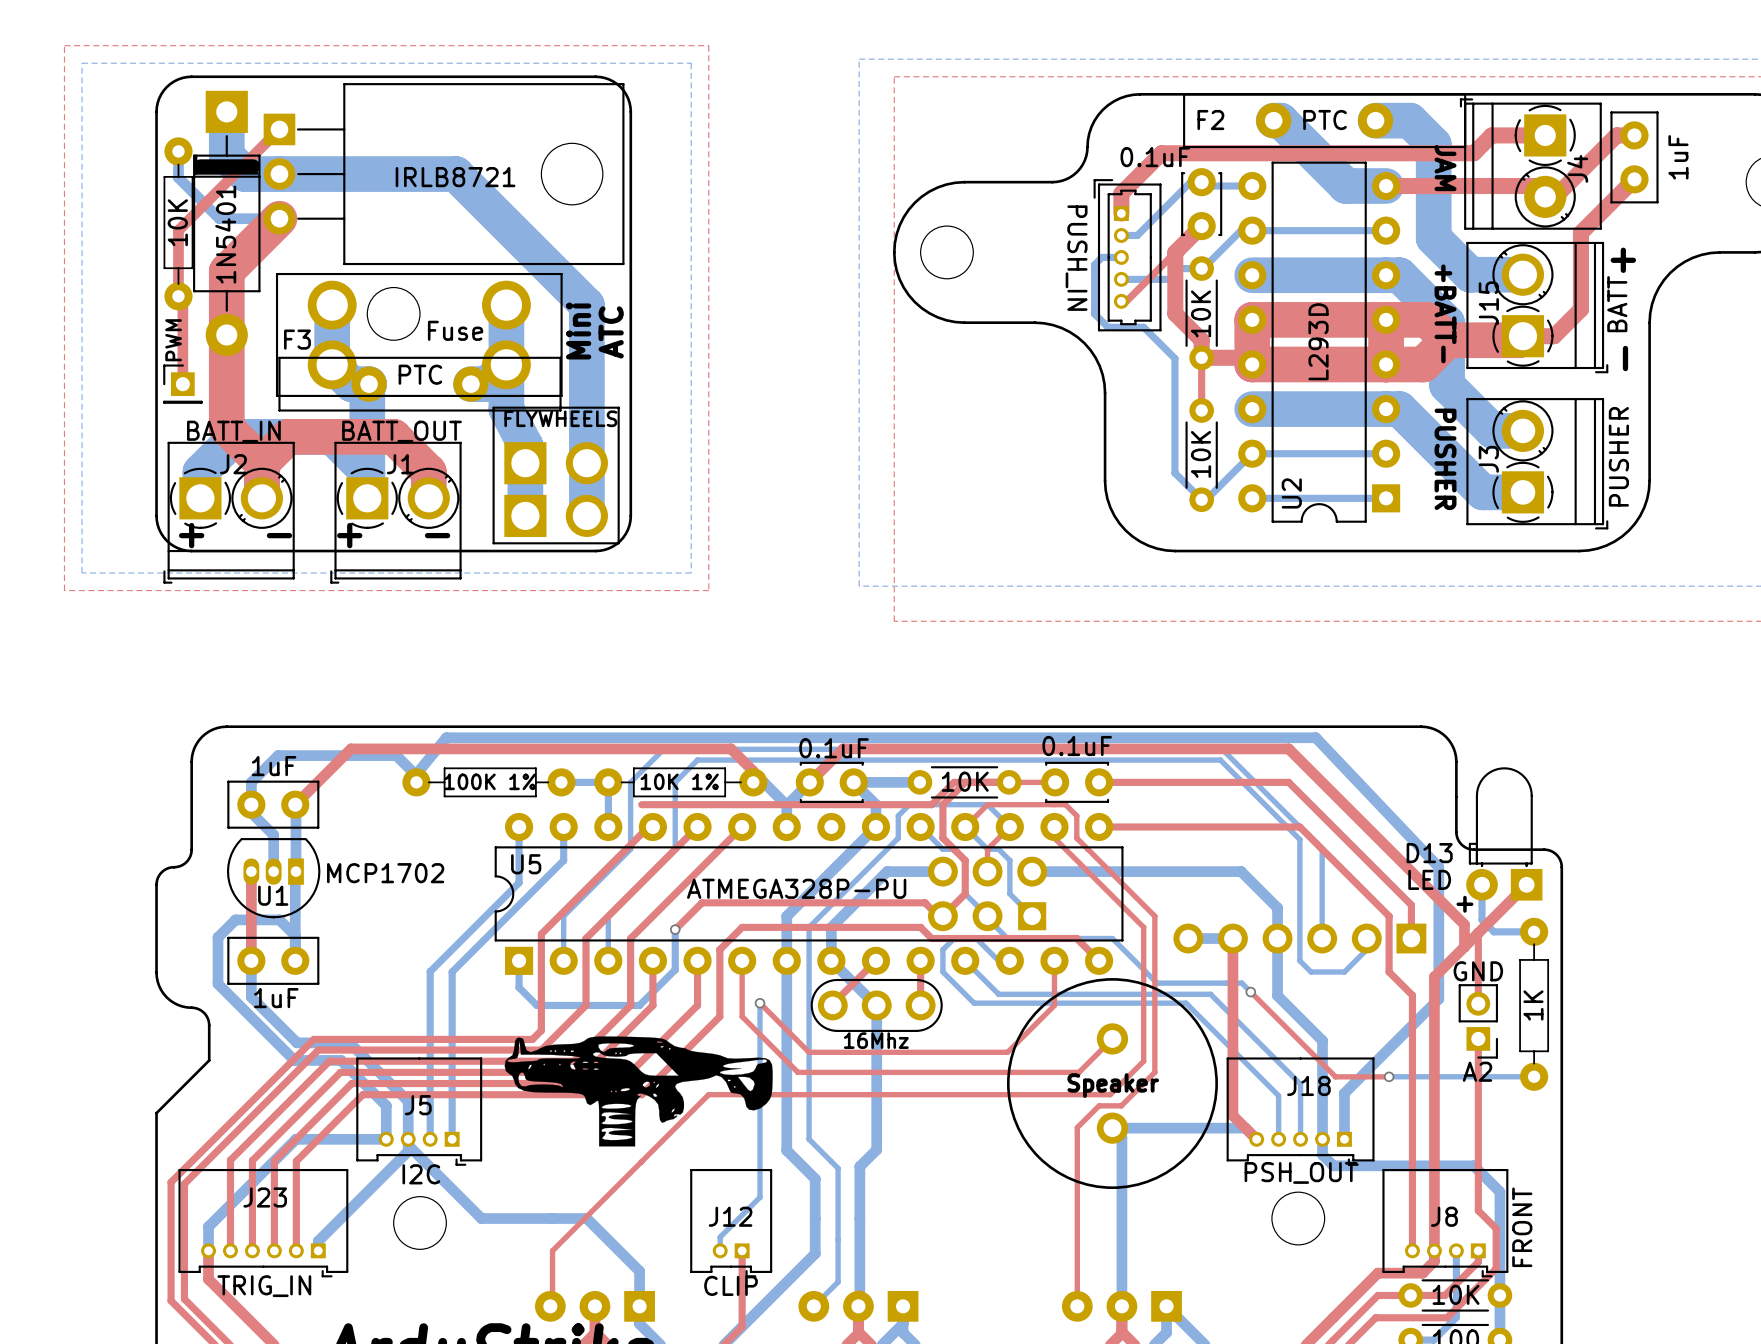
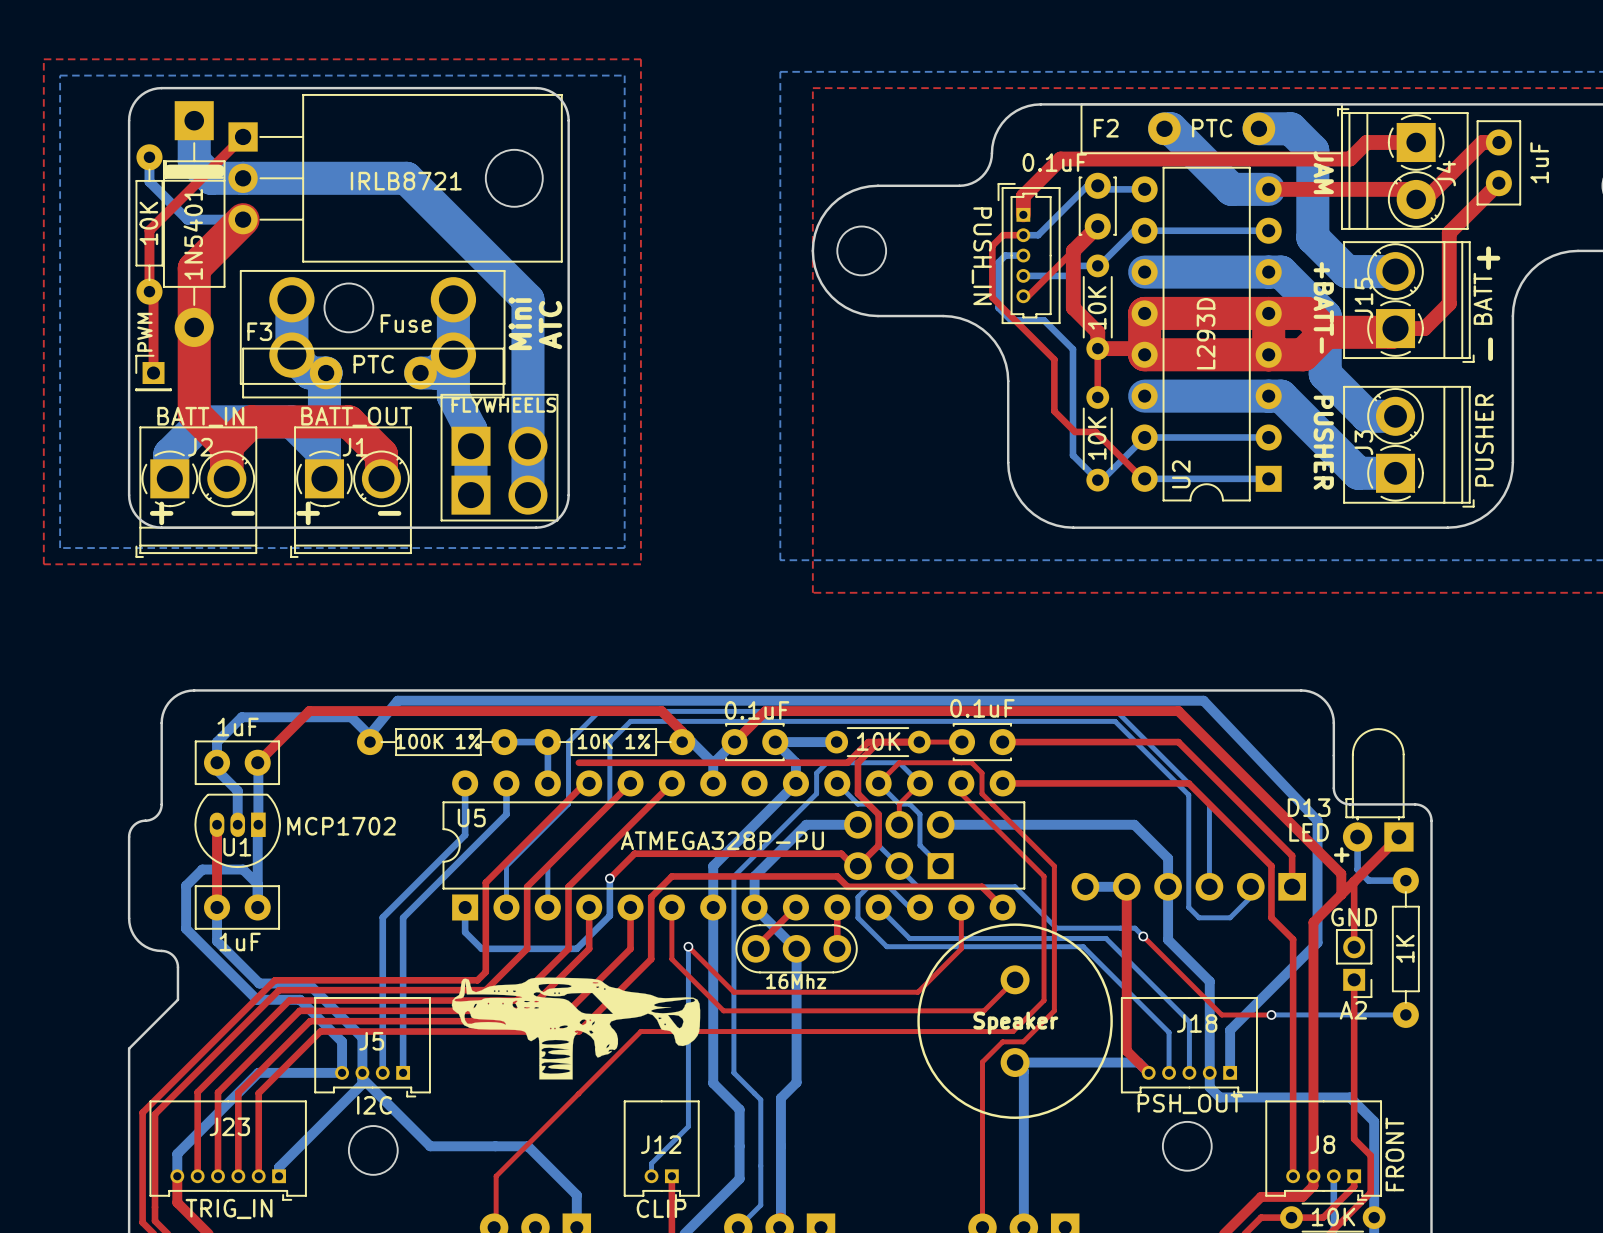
top track: none -> (1023, 235) (1003, 235) (992, 245) (992, 297) (1054, 359) (1054, 411) (1075, 431) (1095, 431) (1144, 478)

